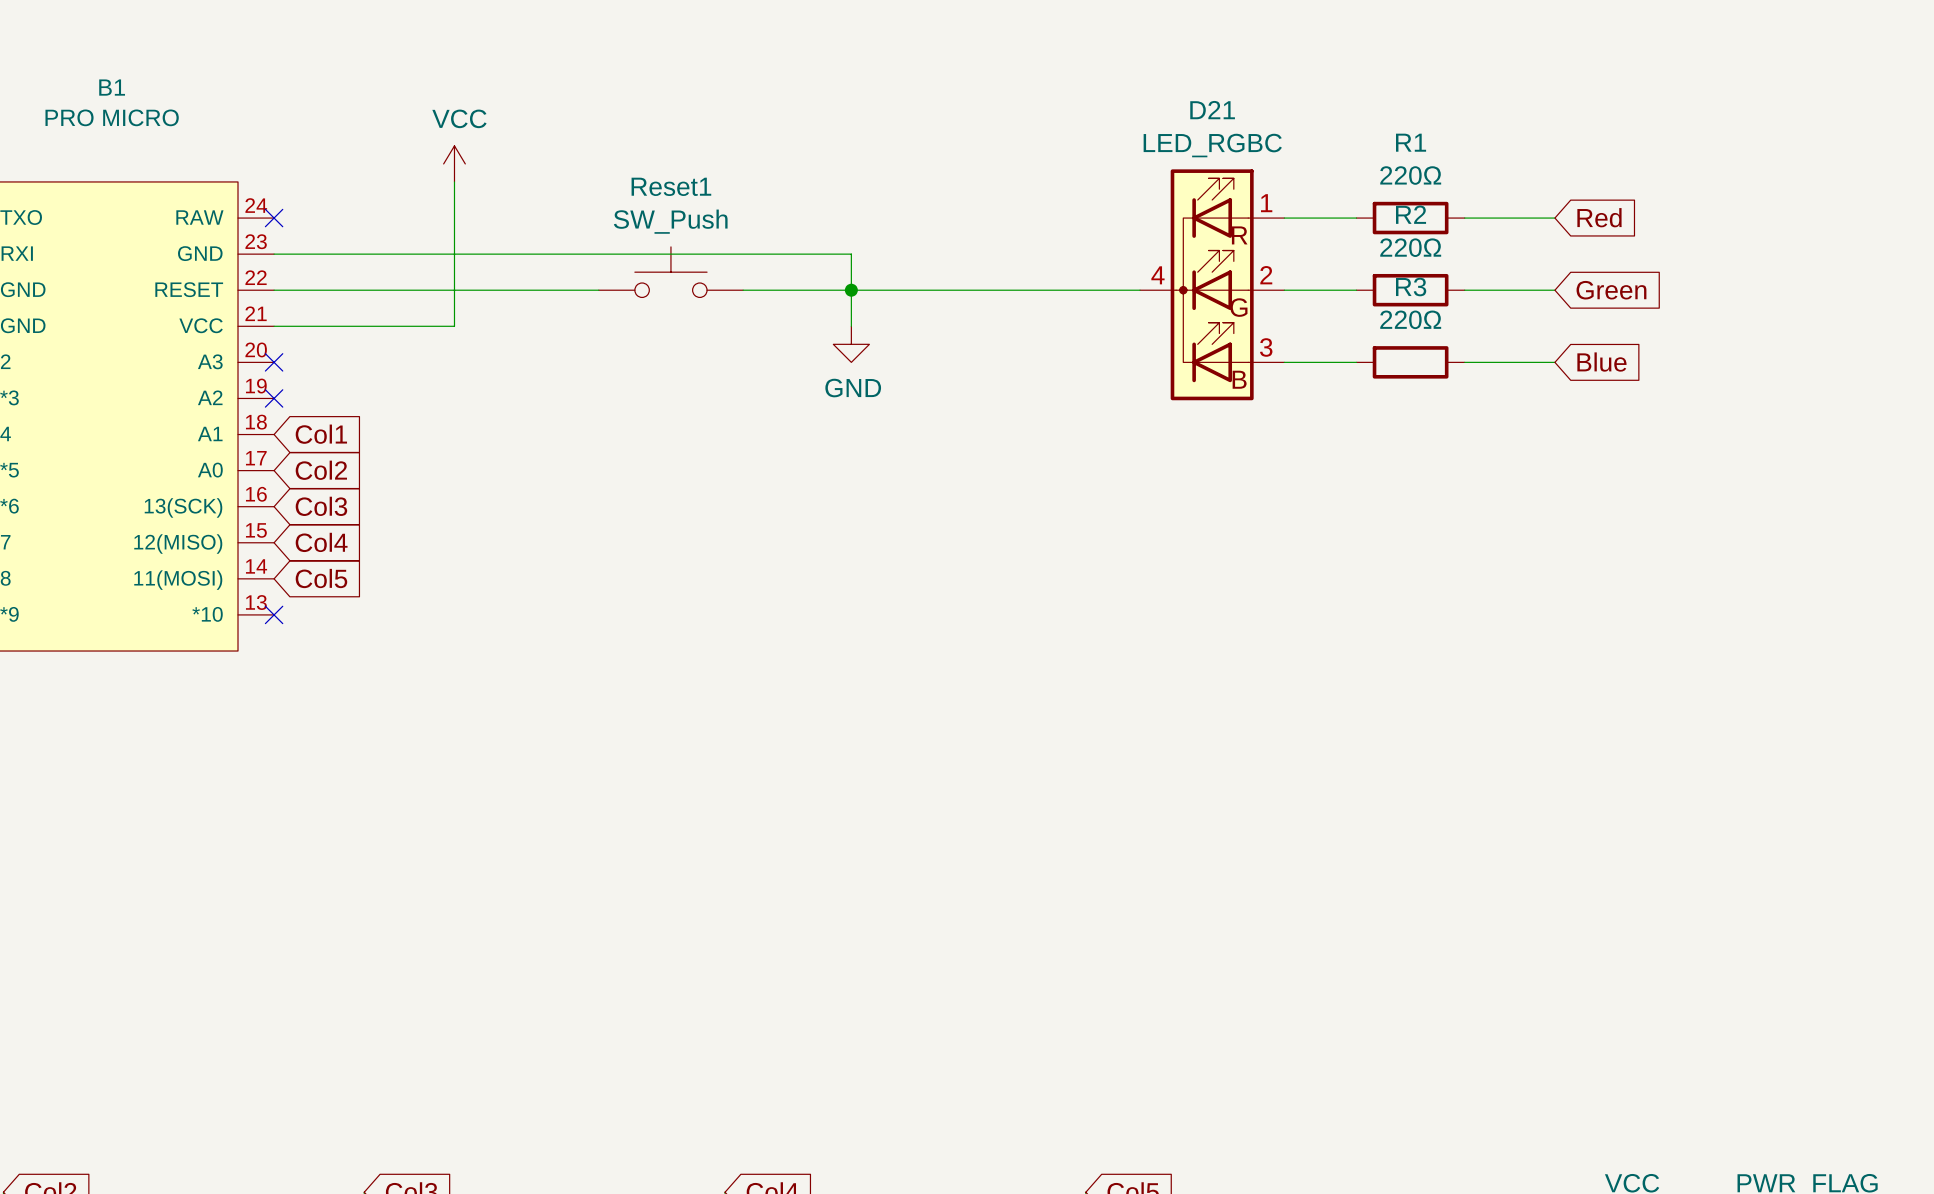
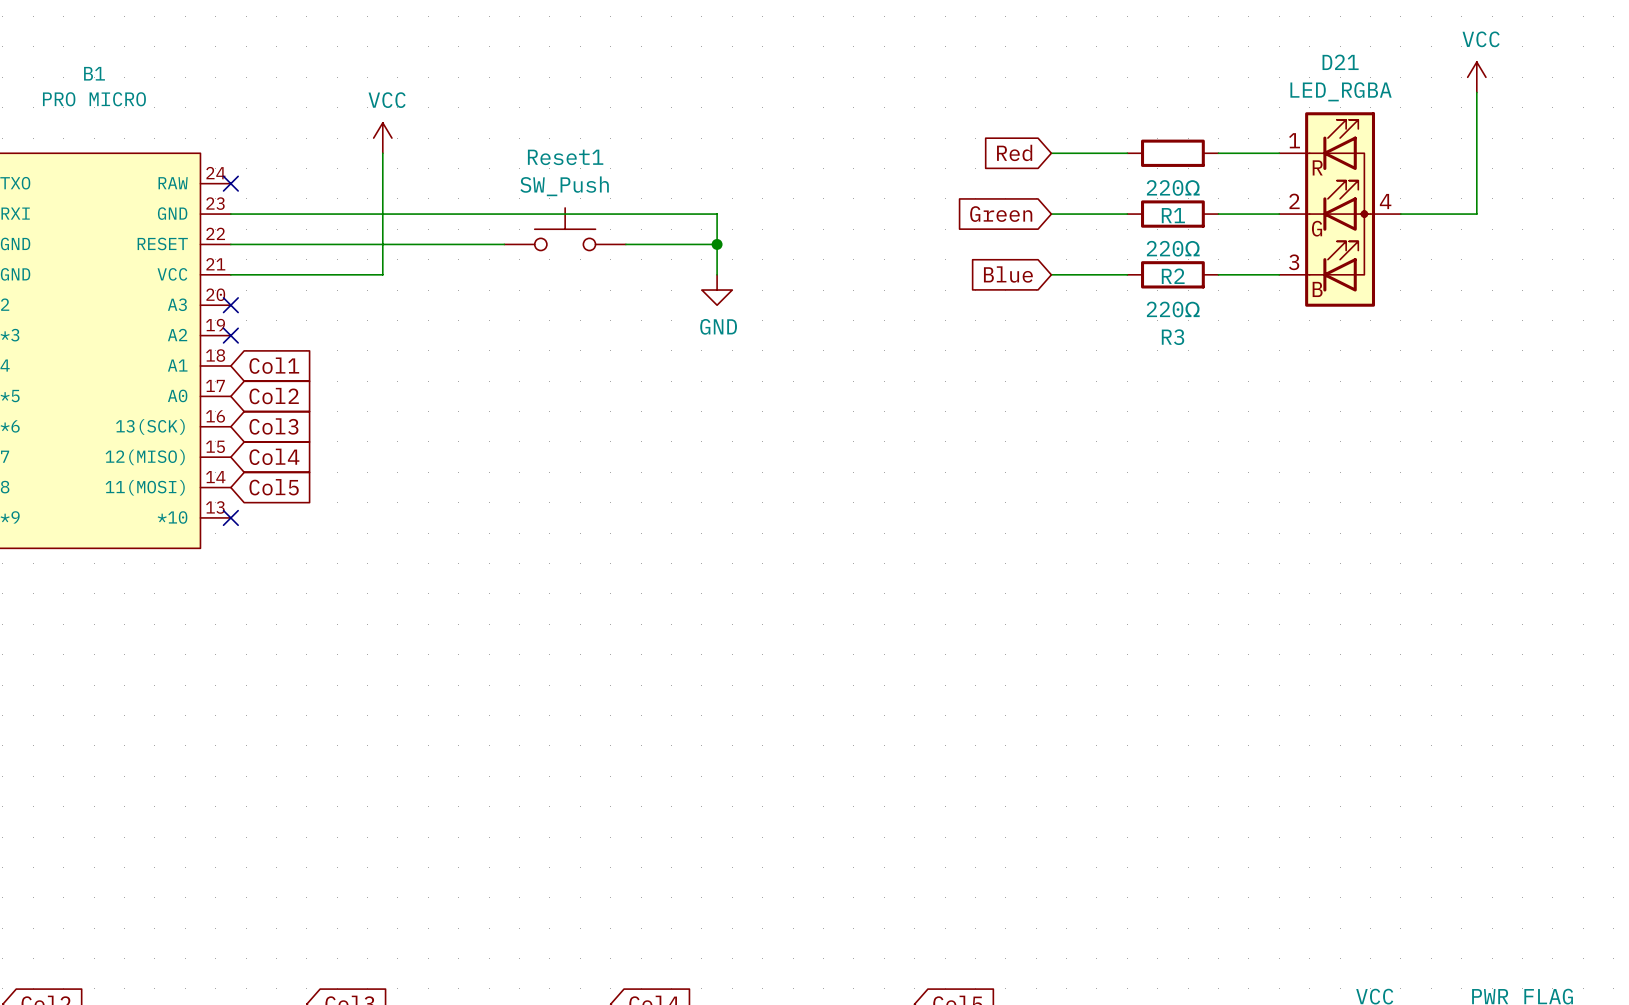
power symbol: none -> VCC (1476, 77)
wire: none -> (1476, 92) (1476, 214) (1400, 214)
R1 name position: R1 (1411, 142) -> R1 (1173, 215)
D21 value: LED_RGBC (1212, 145) -> LED_RGBA (1341, 91)
D21 symbol: [1140, 169, 1285, 401] -> [1279, 112, 1401, 307]
R1 value position: 220Ω (1410, 175) -> 220Ω (1173, 187)
R2 name position: R2 (1411, 214) -> R2 (1173, 276)
global label rotation: 0° (1599, 217) -> 180° (1014, 152)
global label position: Red (1599, 217) -> Red (1014, 152)
wire: (1284, 218) (1356, 218) -> (1218, 153) (1279, 153)
R1 position: (1410, 218) -> (1172, 153)
wire: (1464, 218) (1554, 218) -> (1051, 153) (1127, 153)
R2 value position: 220Ω (1410, 247) -> 220Ω (1173, 248)
R3 name position: R3 (1411, 287) -> R3 (1173, 337)
wire: (851, 290) (1140, 290) -> none
wire: (1284, 290) (1356, 290) -> (1218, 214) (1279, 214)
R2 position: (1410, 290) -> (1172, 214)
wire: (1464, 290) (1554, 290) -> (1051, 214) (1127, 214)
global label rotation: 0° (1611, 290) -> 180° (1001, 214)
global label position: Green (1611, 290) -> Green (1001, 214)
R3 value position: 220Ω (1410, 319) -> 220Ω (1173, 309)
wire: (1284, 362) (1356, 362) -> (1218, 274) (1279, 274)
R3 position: (1410, 362) -> (1172, 274)
wire: (1464, 362) (1554, 362) -> (1051, 274) (1127, 274)
global label rotation: 0° (1601, 362) -> 180° (1008, 274)
global label position: Blue (1601, 362) -> Blue (1008, 274)

